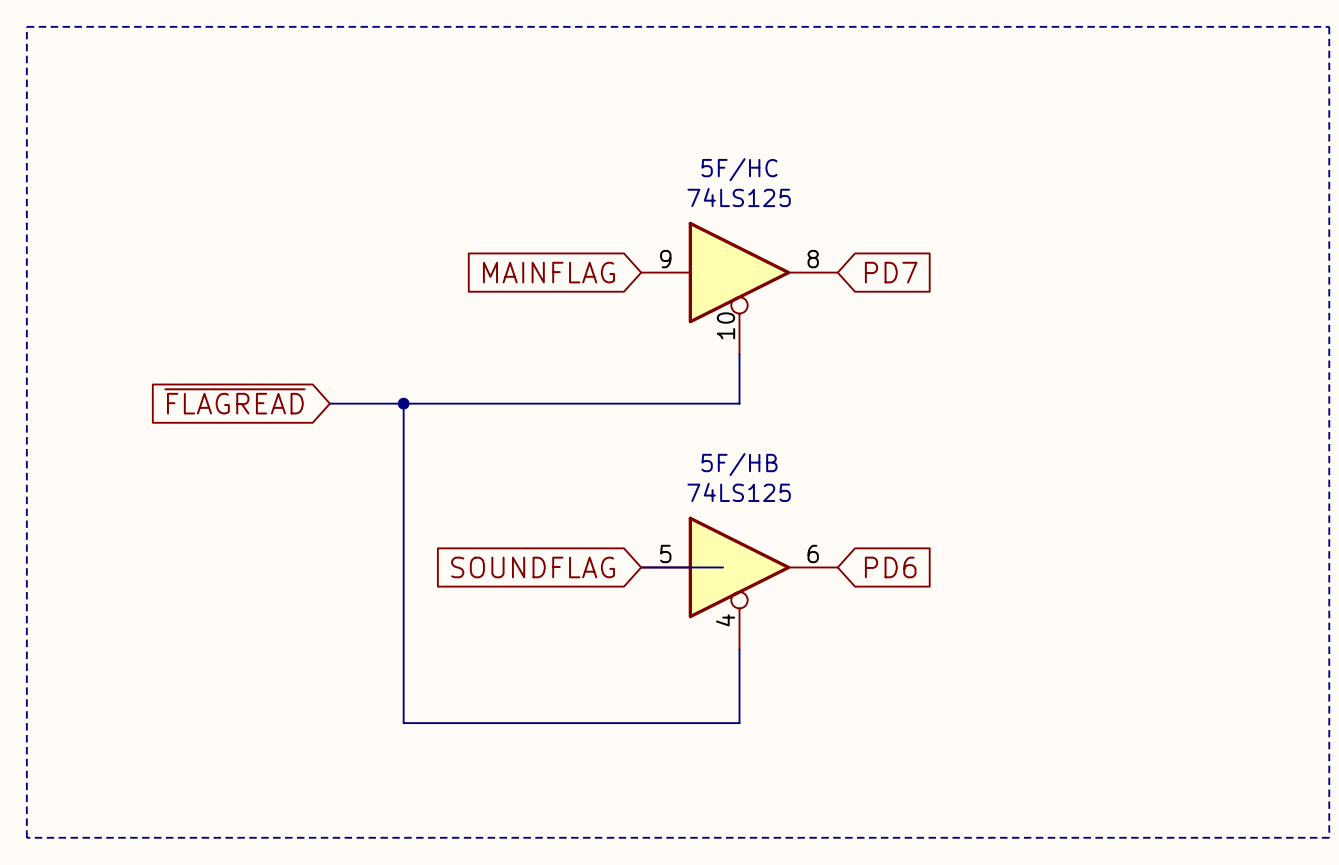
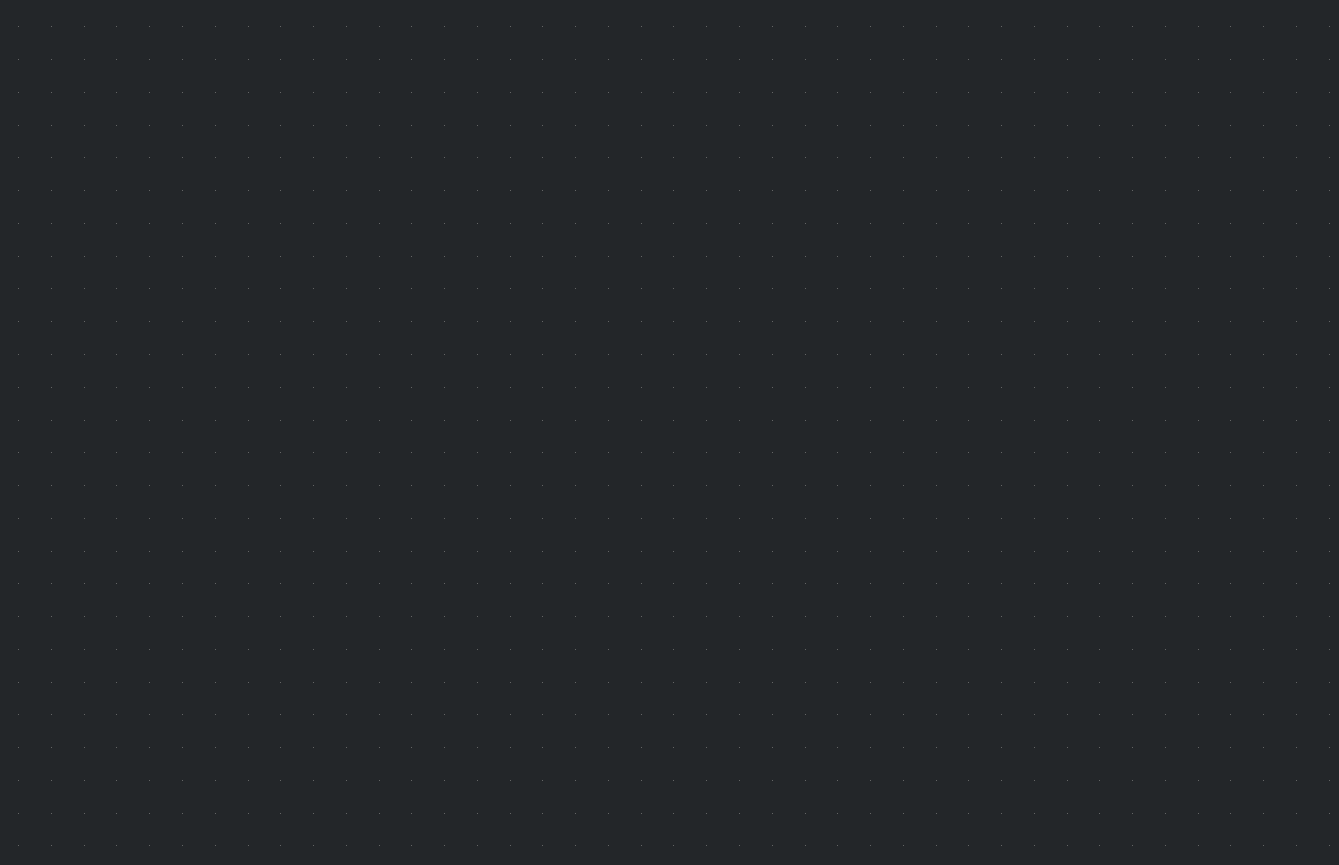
line: (26, 26) (1329, 26) (1329, 837) (26, 837) (26, 26) -> none
global label: MAINFLAG (548, 272) -> none
global label: PD7 (891, 272) -> none
5F/HC: 74LS125 (739, 288) -> none
wire: (739, 354) (739, 403) (329, 403) -> none
global label: ~{FLAGREAD} (234, 401) -> none
wire: (403, 403) (403, 723) (739, 723) (739, 649) -> none
junction: (403, 403) -> none
global label: SOUNDFLAG (533, 567) -> none
wire: (641, 567) (723, 567) -> none
global label: PD6 (890, 567) -> none
5F/HB: 74LS125 (739, 583) -> none

